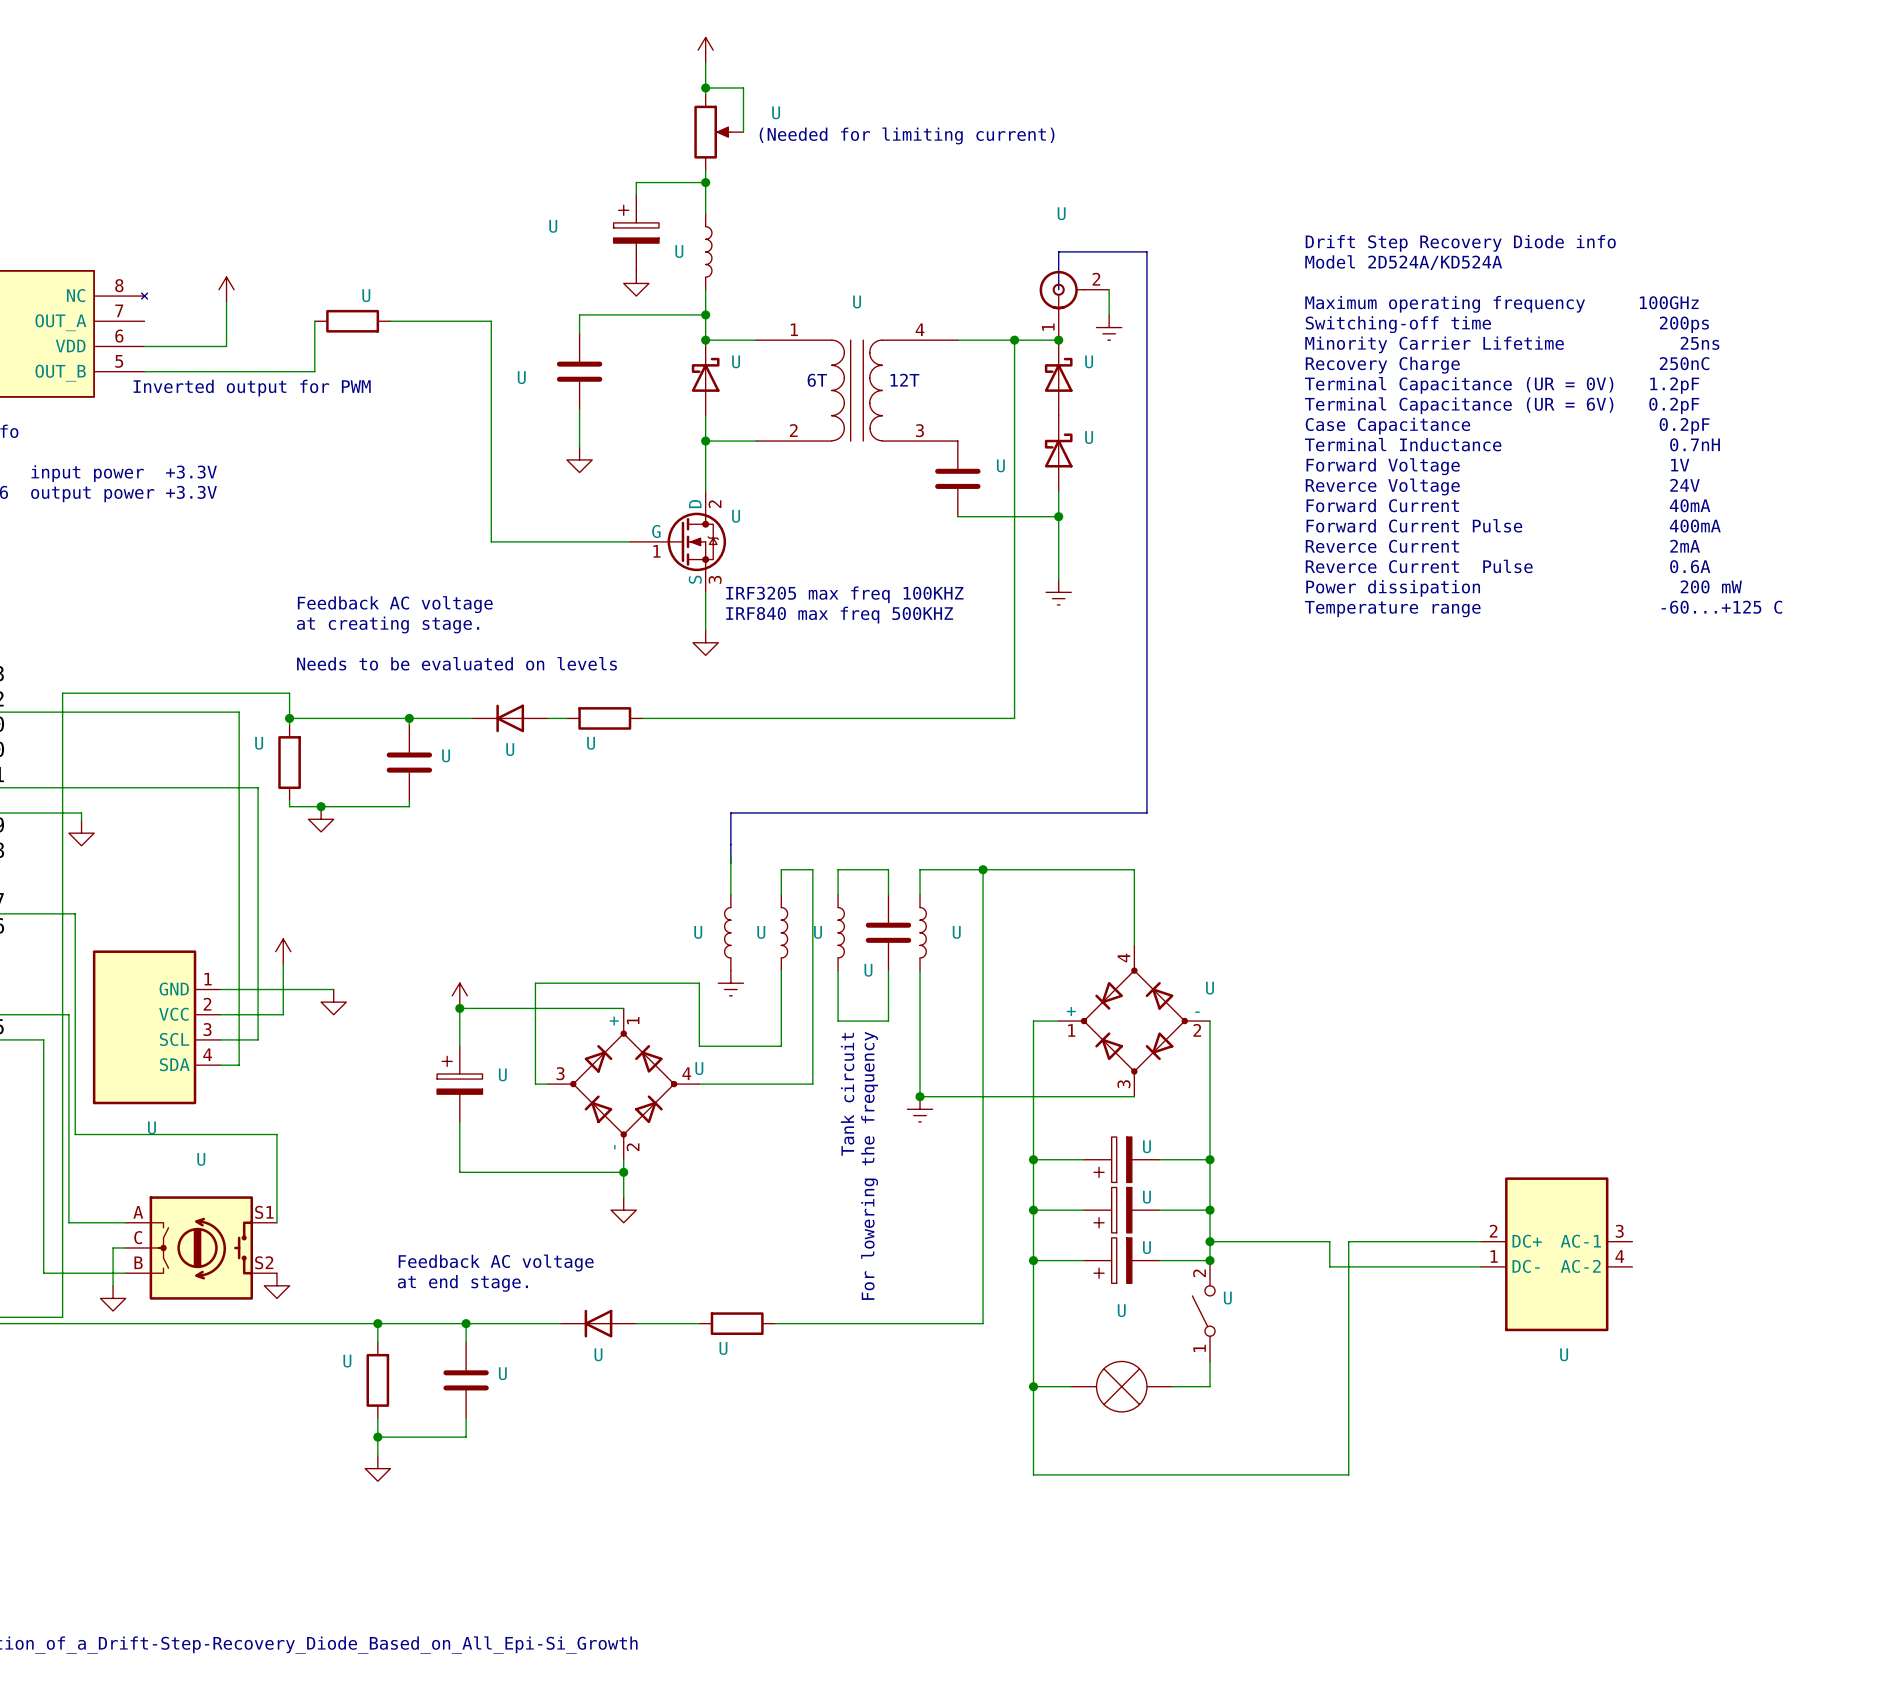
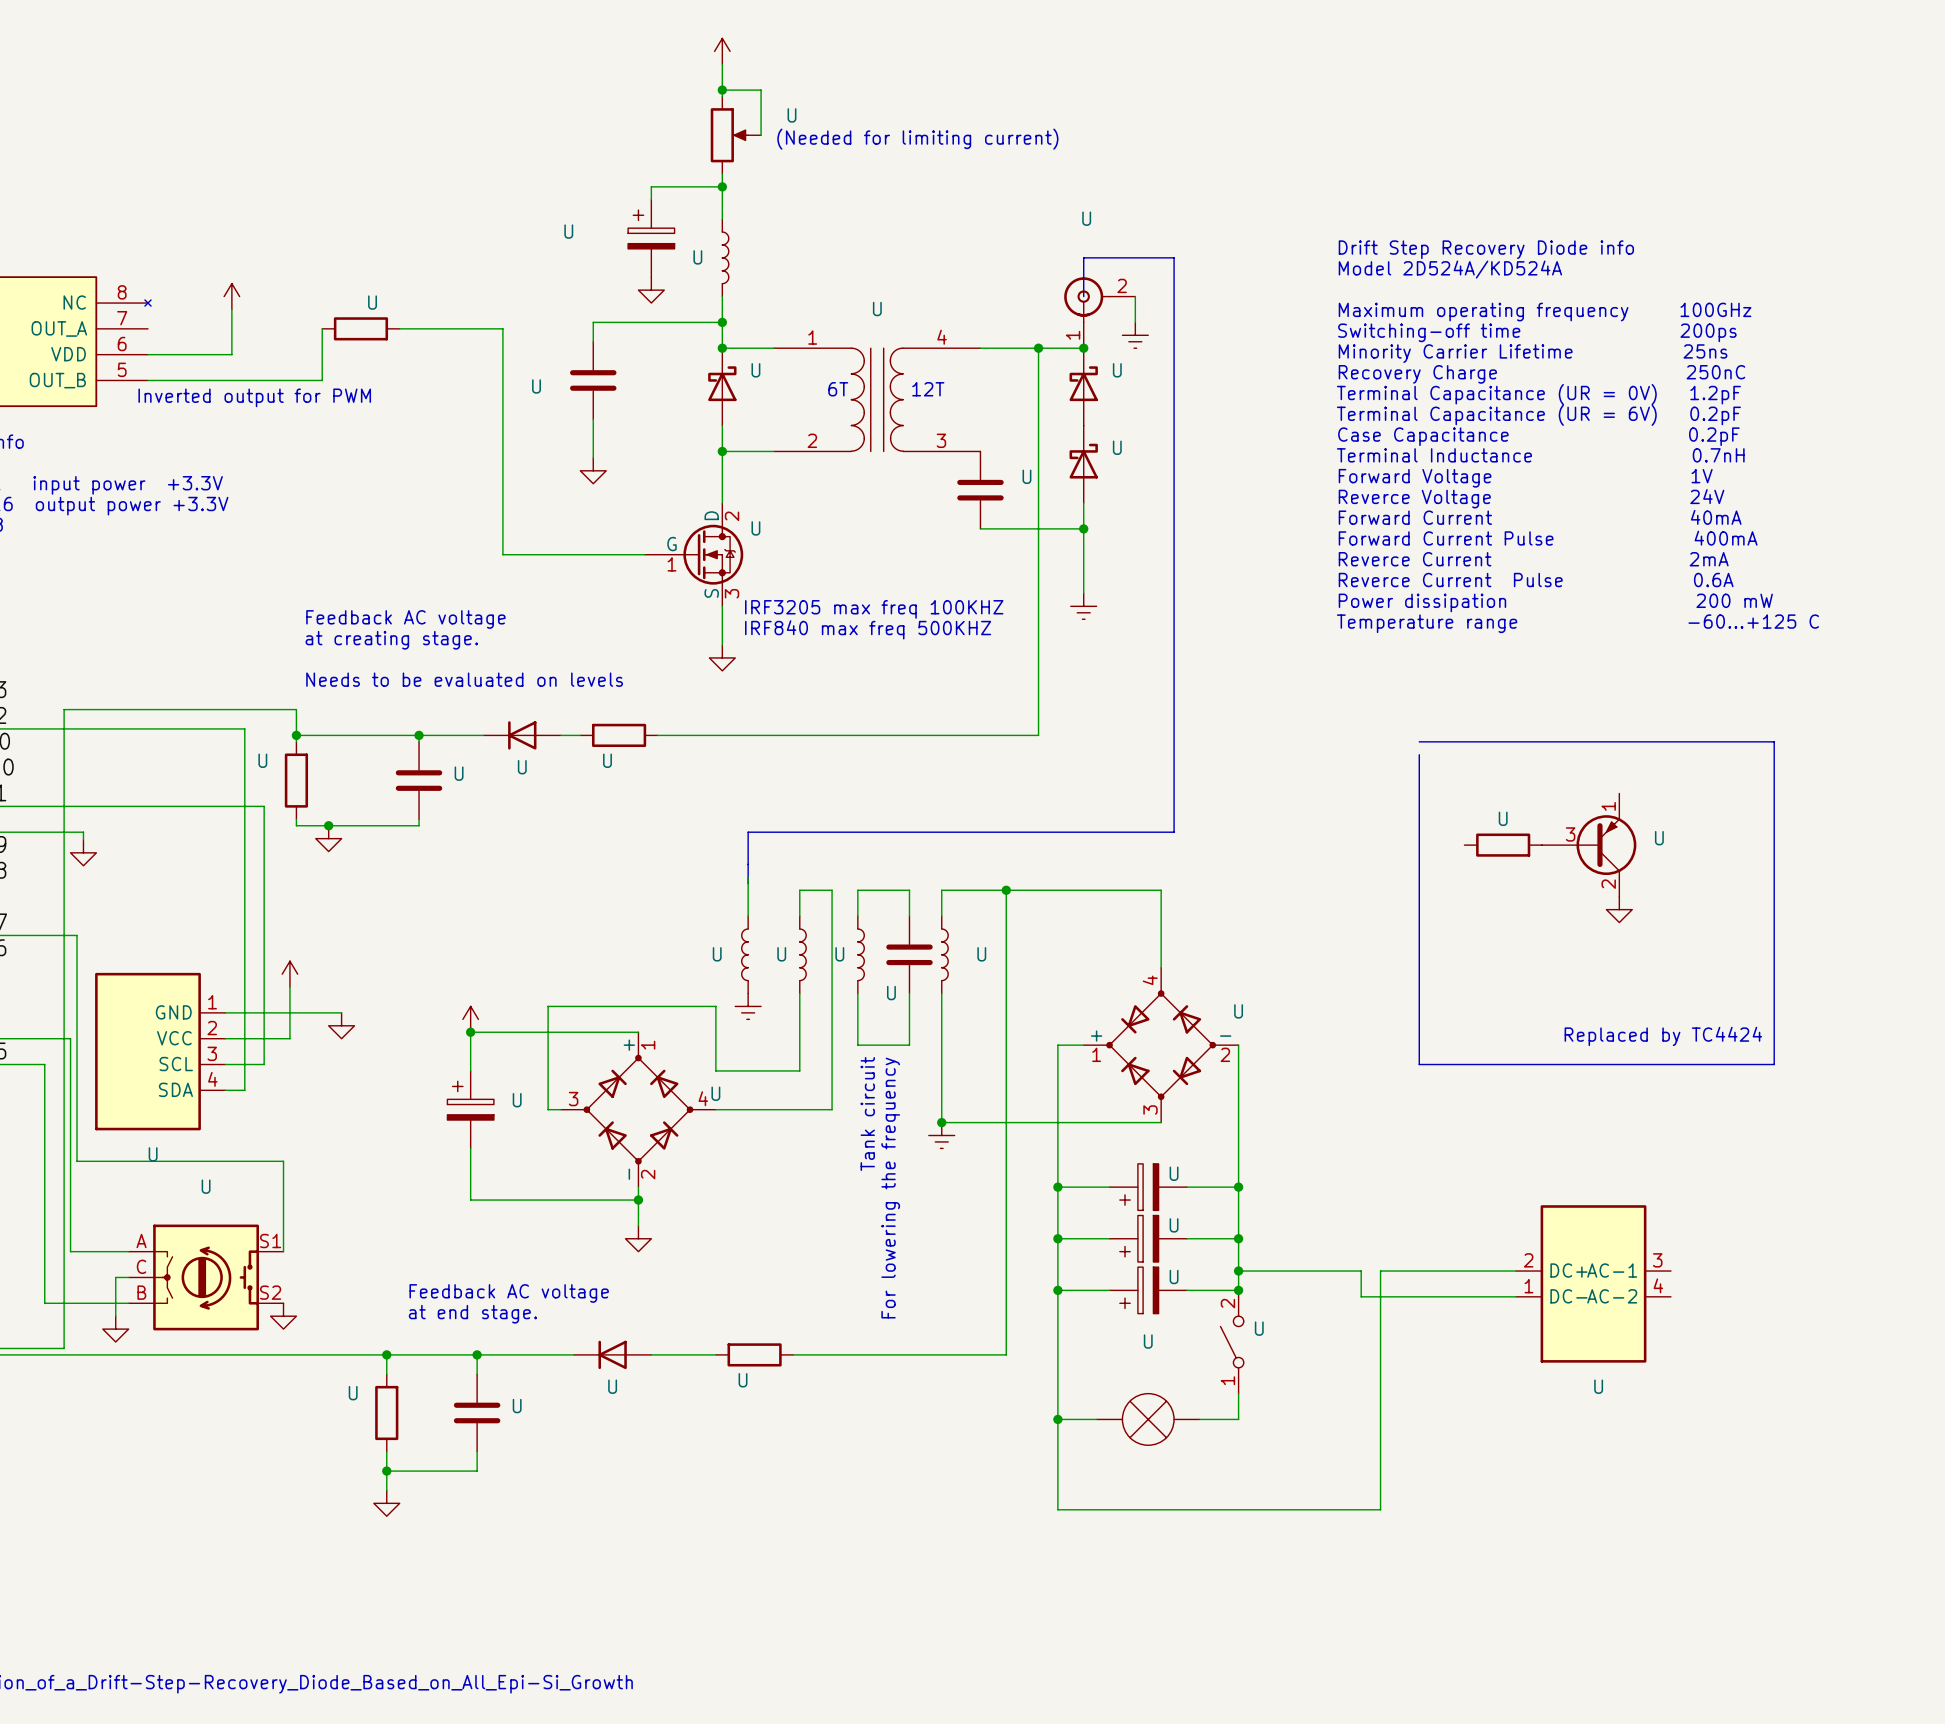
line: none -> (1419, 741) (1774, 741) (1774, 1064) (1419, 1064) (1419, 754)
U: none -> (1503, 845)
U: none -> (1589, 845)
power symbol: none -> (1619, 909)
text: none -> Replaced by TC4424 (1663, 1036)

